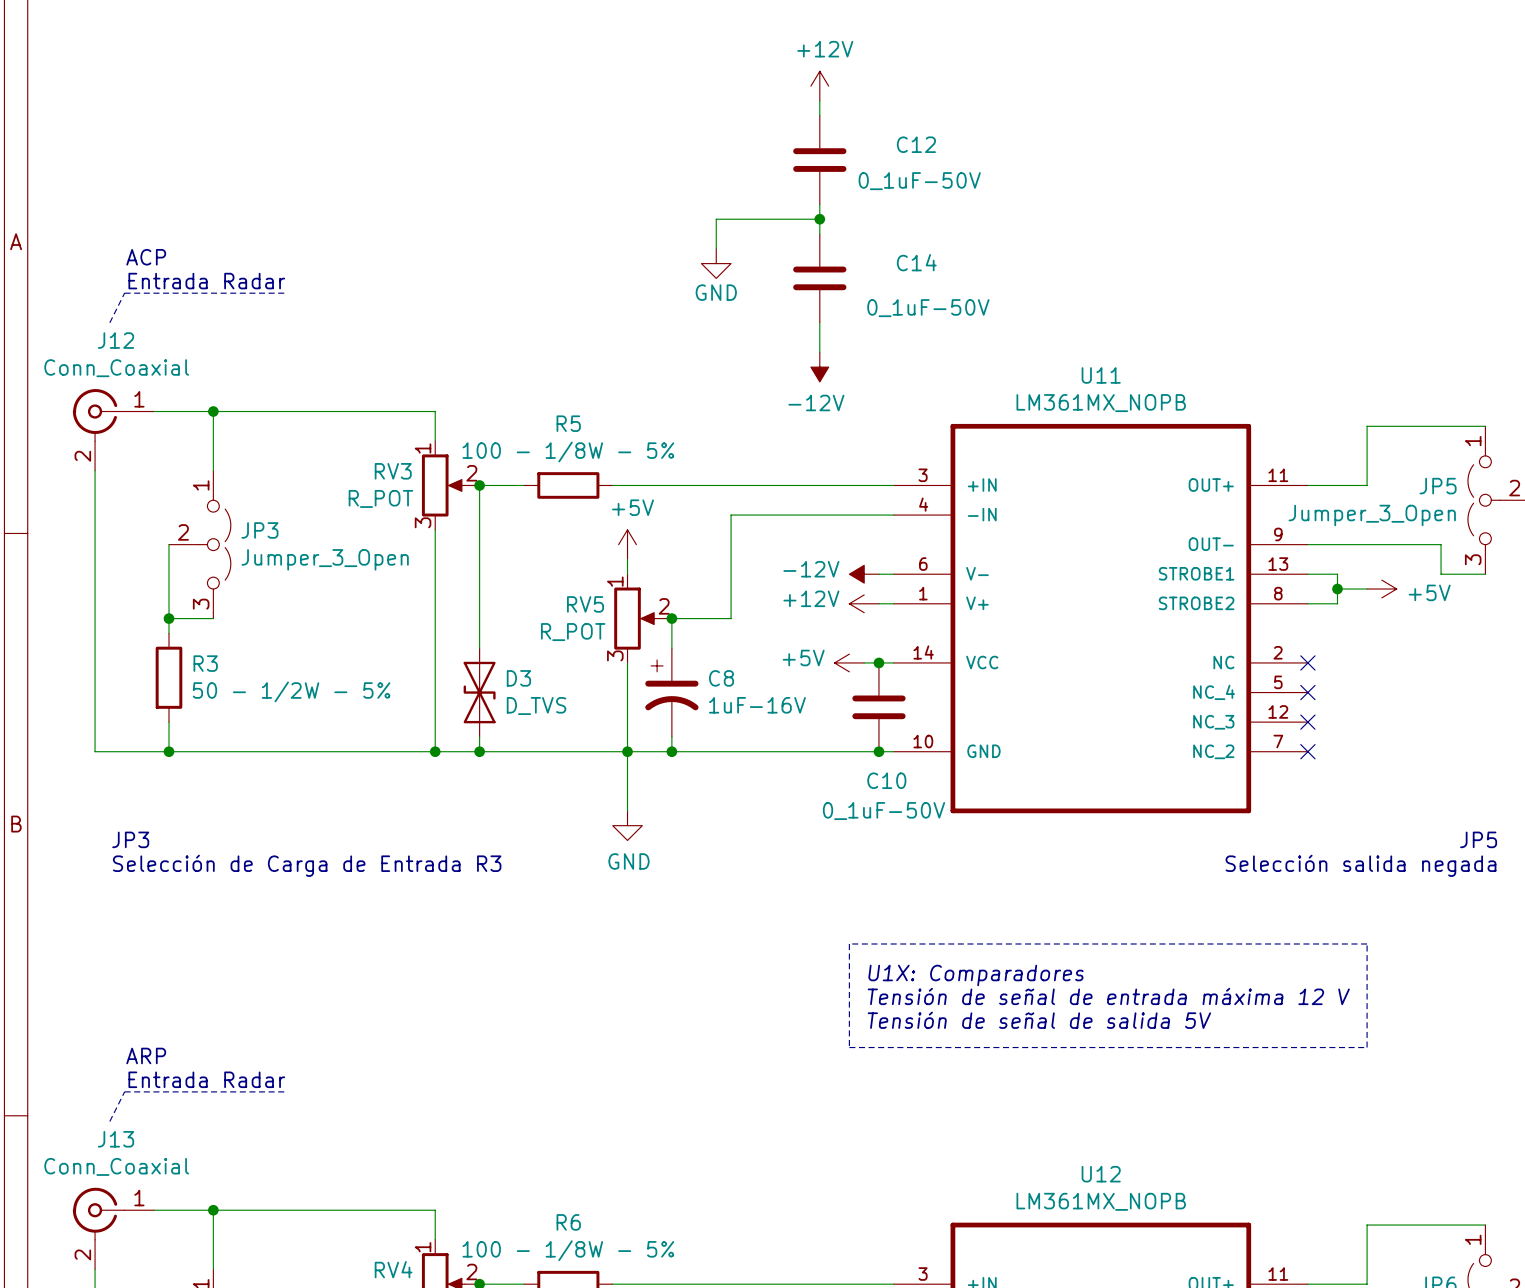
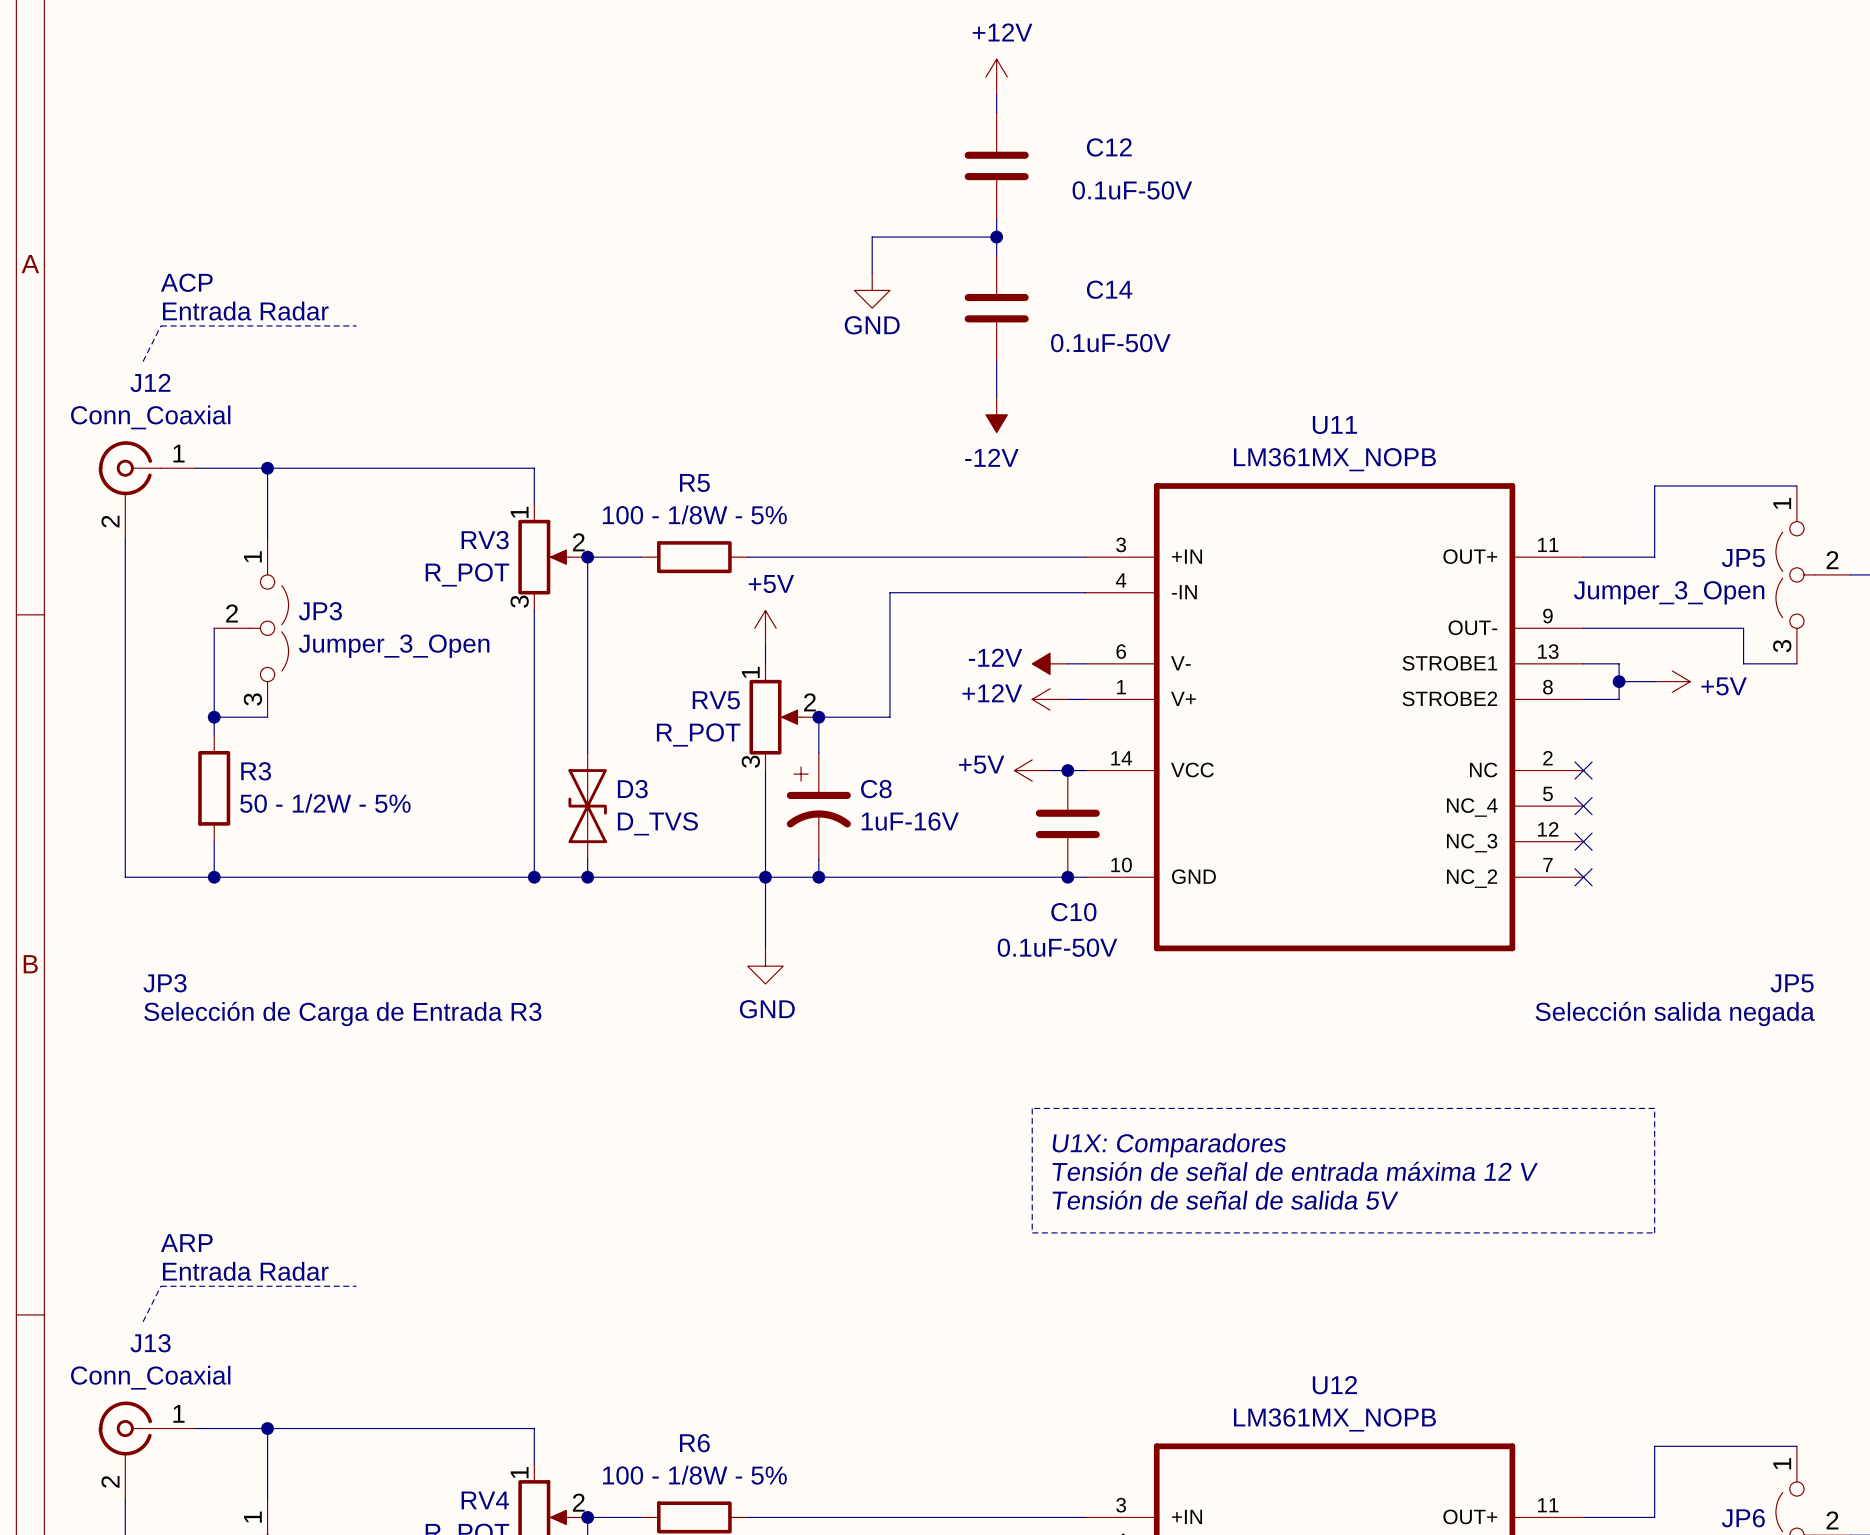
C12 value: 0_1uF-50V (919, 181) -> 0.1uF-50V (1132, 190)
C14 value: 0_1uF-50V (928, 308) -> 0.1uF-50V (1110, 343)
C10 value: 0_1uF-50V (884, 811) -> 0.1uF-50V (1057, 947)

